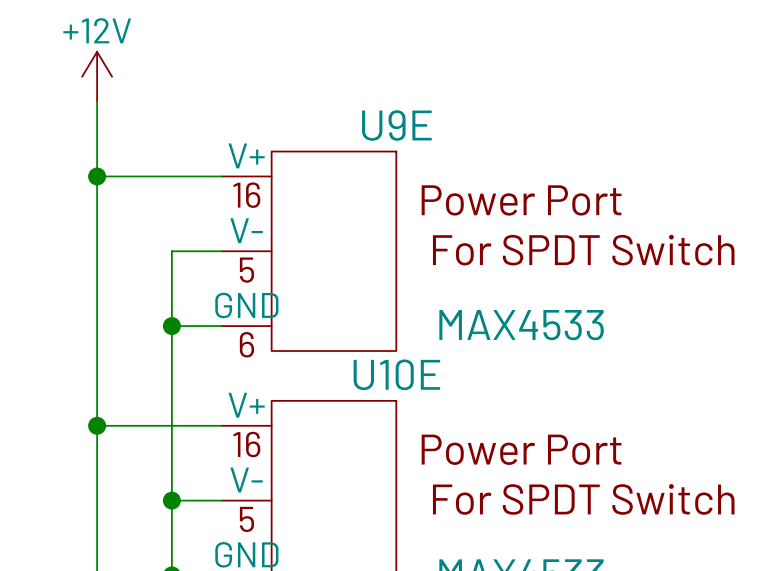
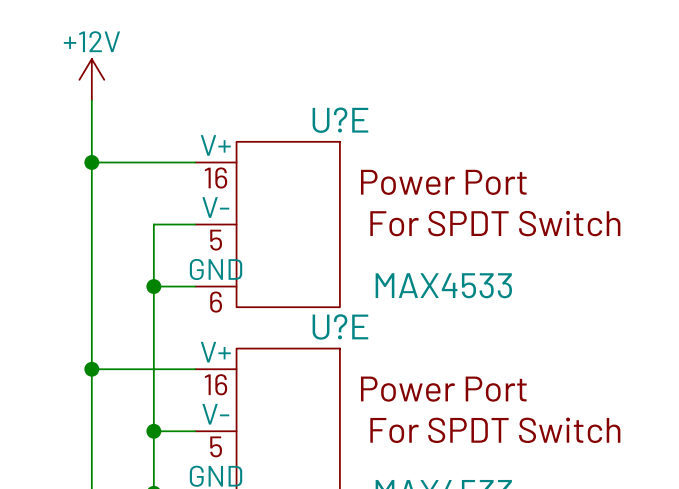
U9E name: U9E (396, 125) -> U?E (340, 120)
U10E name: U10E (396, 374) -> U?E (340, 326)

